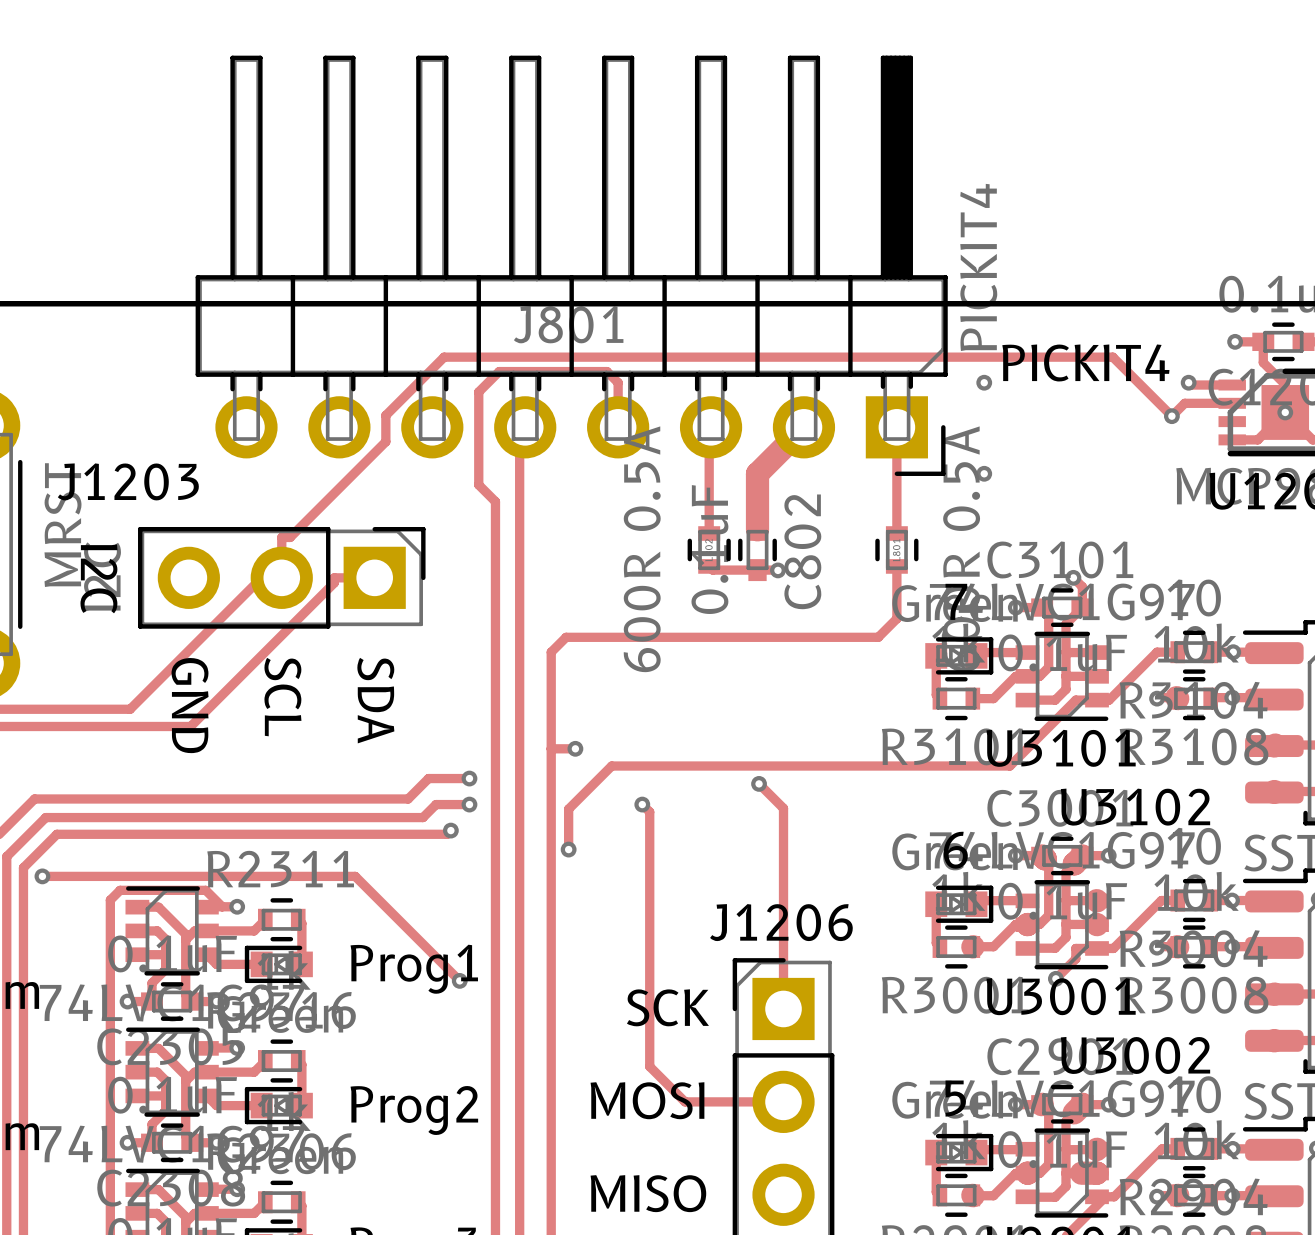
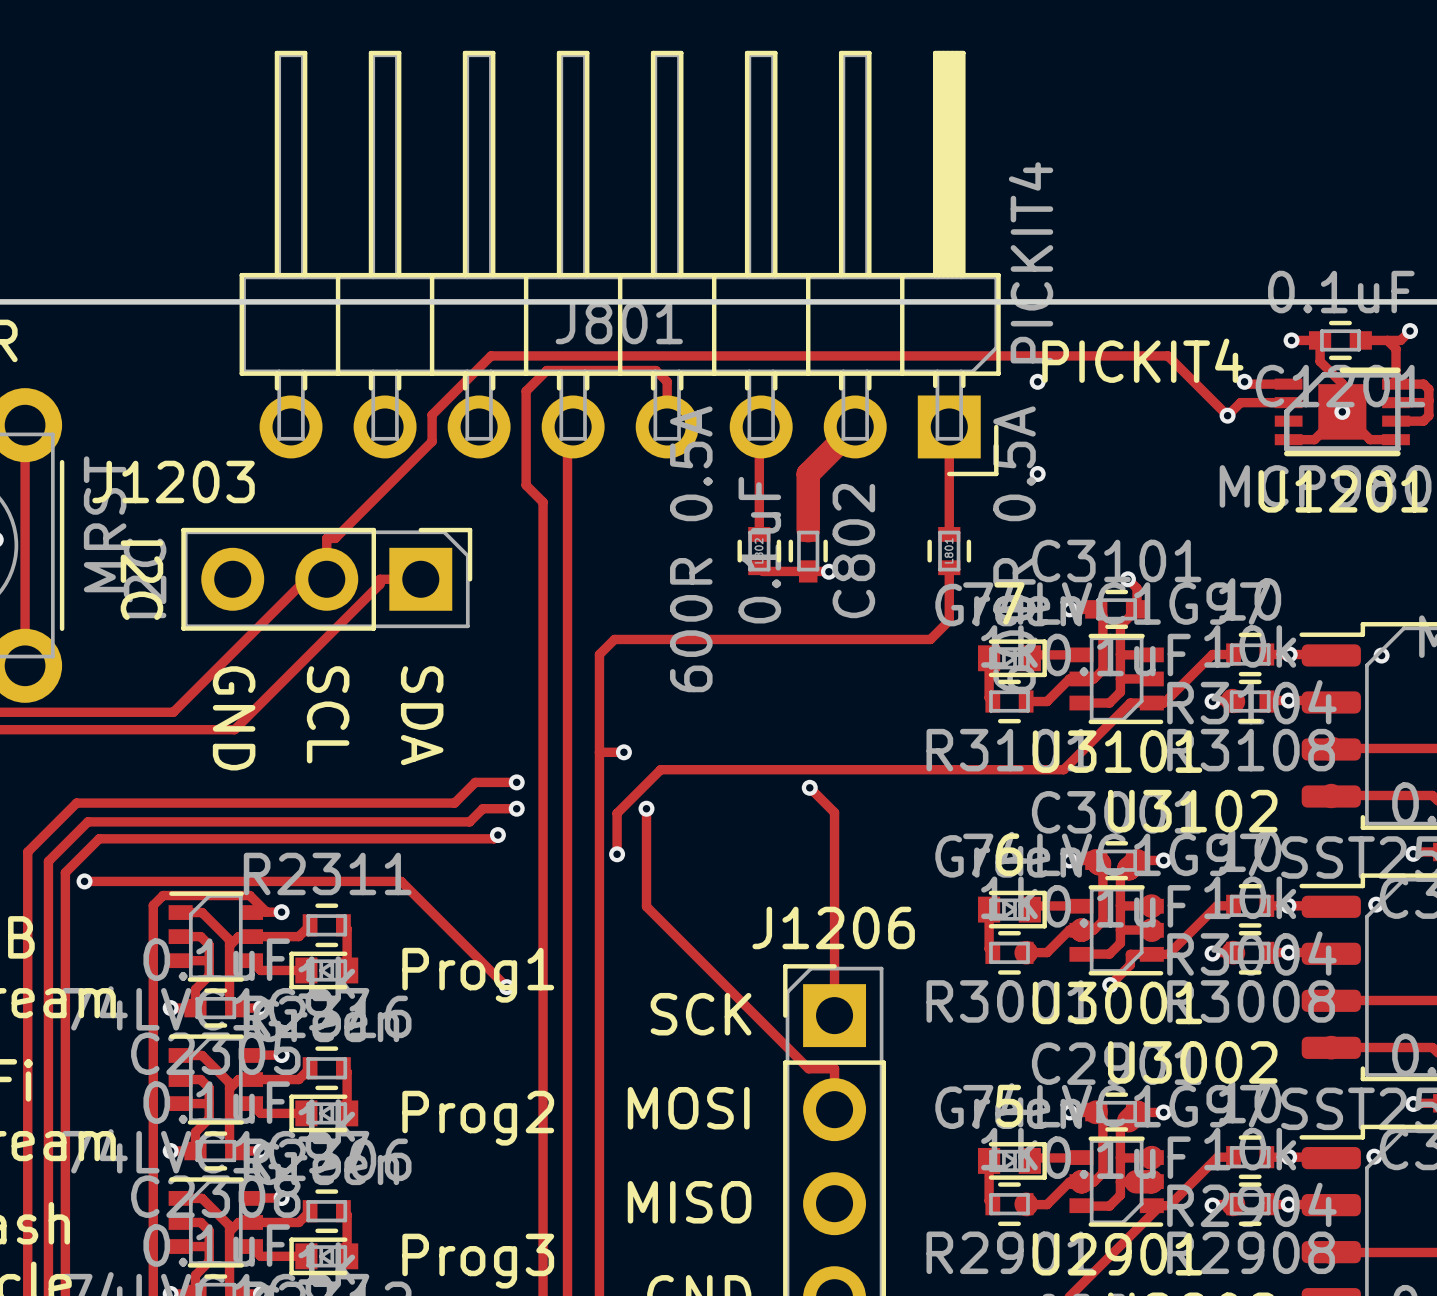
track: (642, 804) (649, 811) (649, 1066) (685, 1101) (783, 1101) -> (646, 808) (646, 906) (808, 1068) (834, 1068) (834, 1109)
via position: (642, 804) -> (646, 808)

